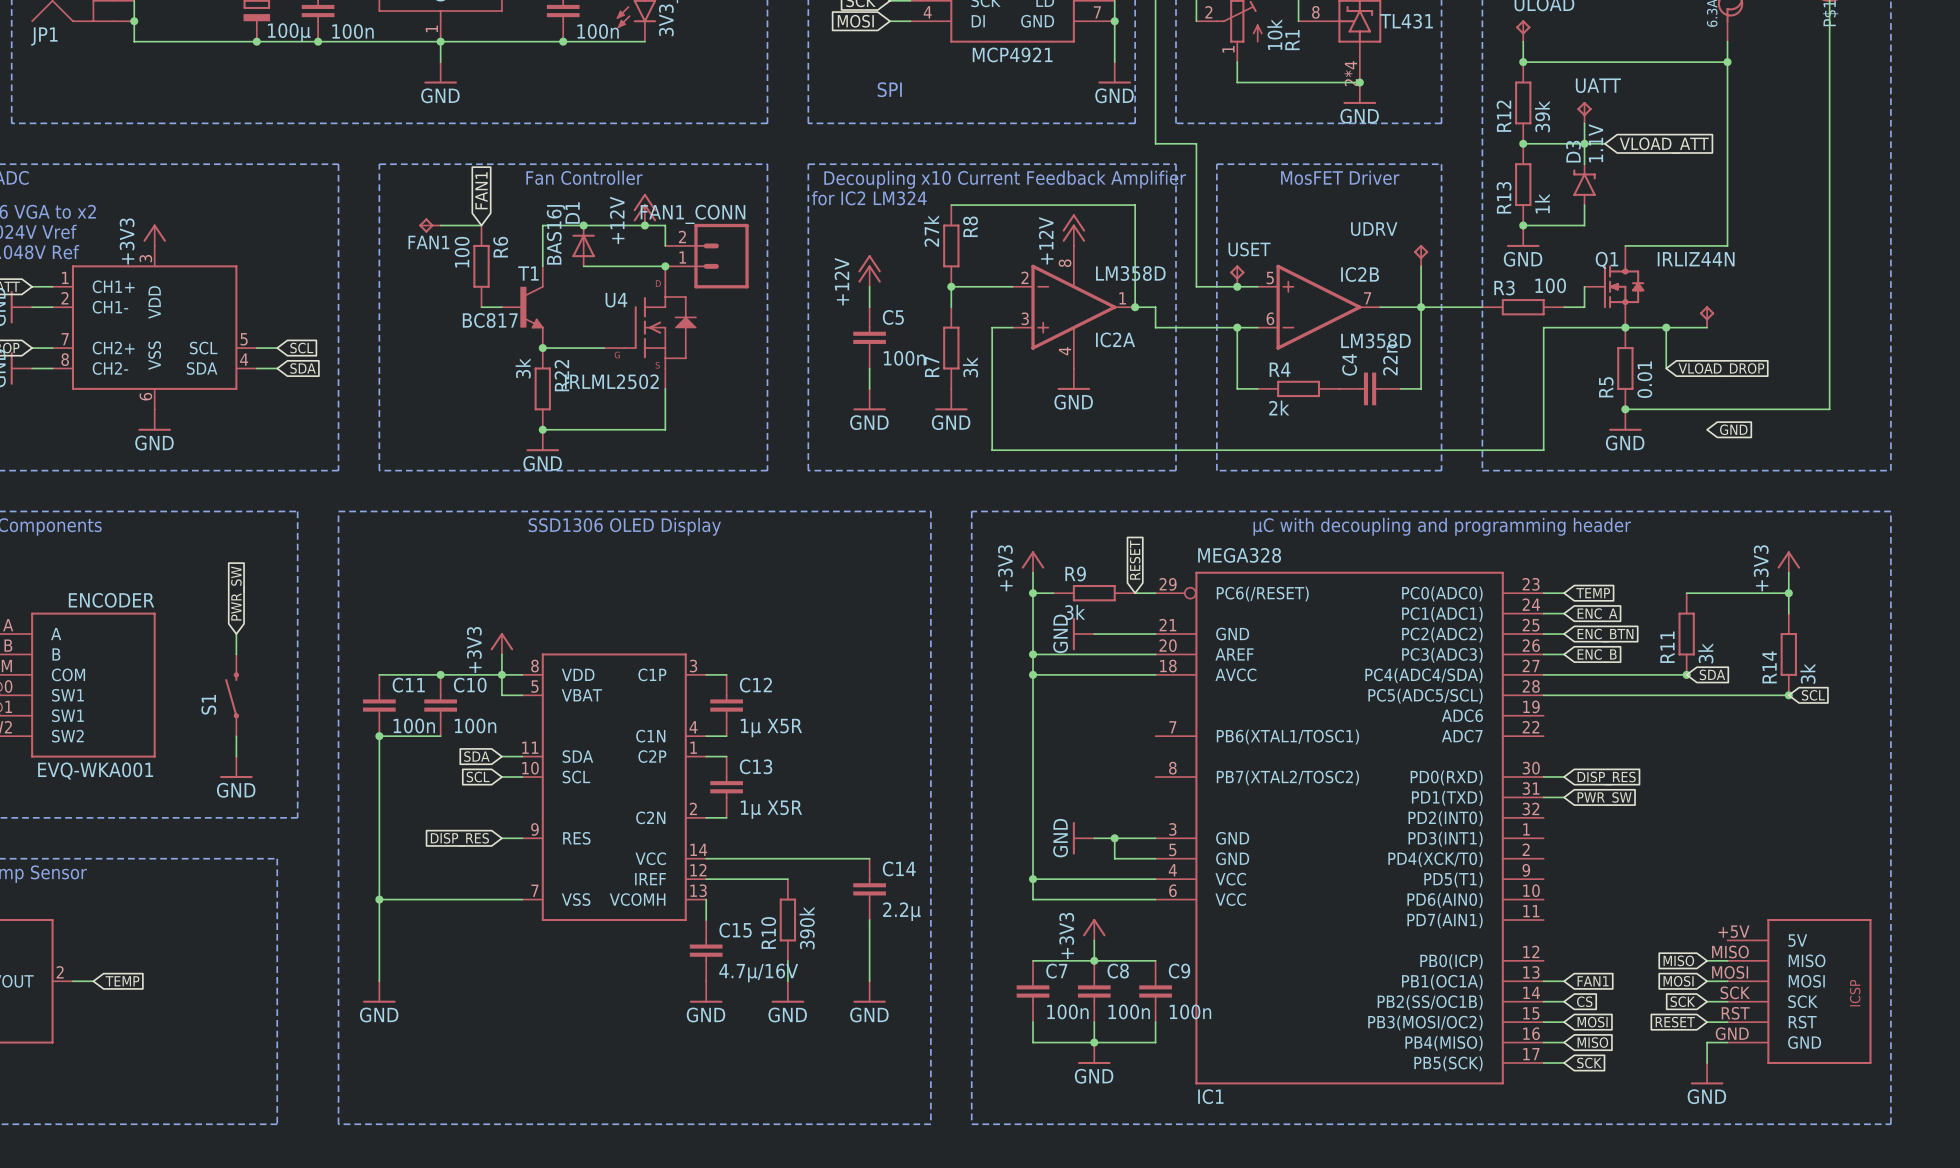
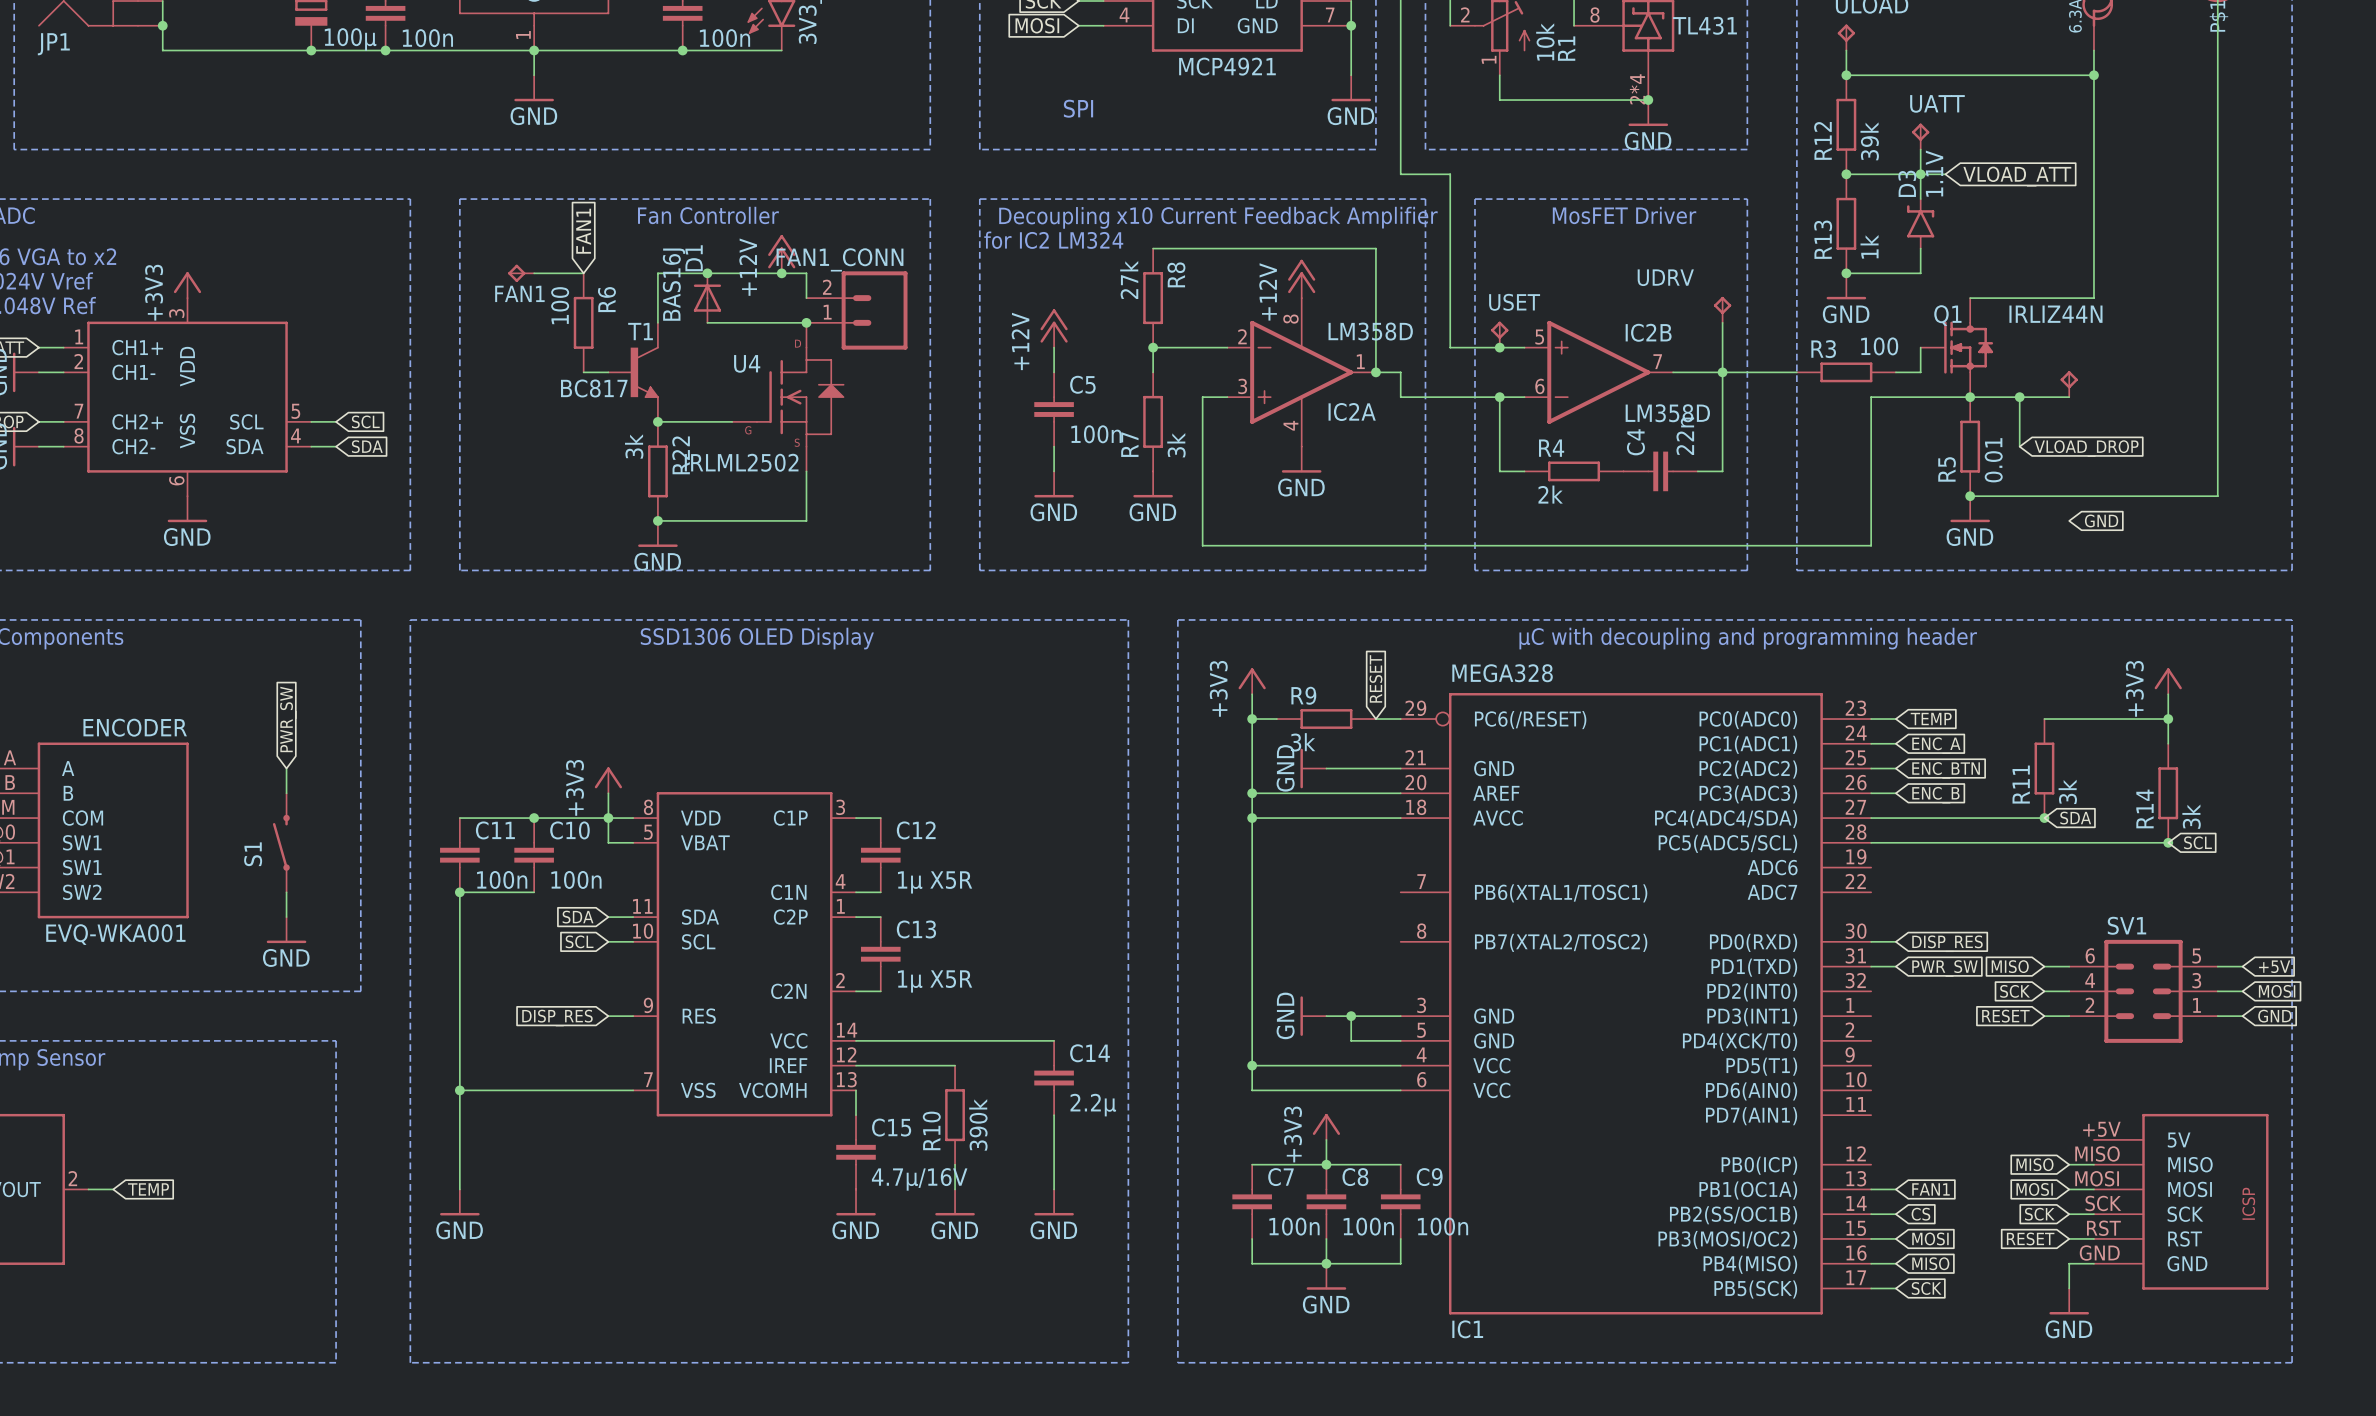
global label: none -> MISO (2010, 966)
wire: none -> (2044, 966) (2069, 966)
wire: none -> (2217, 966) (2242, 966)
global label: none -> +5V (2274, 966)
global label: none -> SCK (2015, 991)
wire: none -> (2044, 991) (2069, 991)
SV1: none -> (2143, 991)
wire: none -> (2217, 991) (2242, 991)
global label: none -> MOSI (2277, 991)
global label: none -> RESET (2005, 1016)
wire: none -> (2044, 1016) (2069, 1016)
wire: none -> (2217, 1016) (2242, 1016)
global label: none -> GND (2274, 1016)

